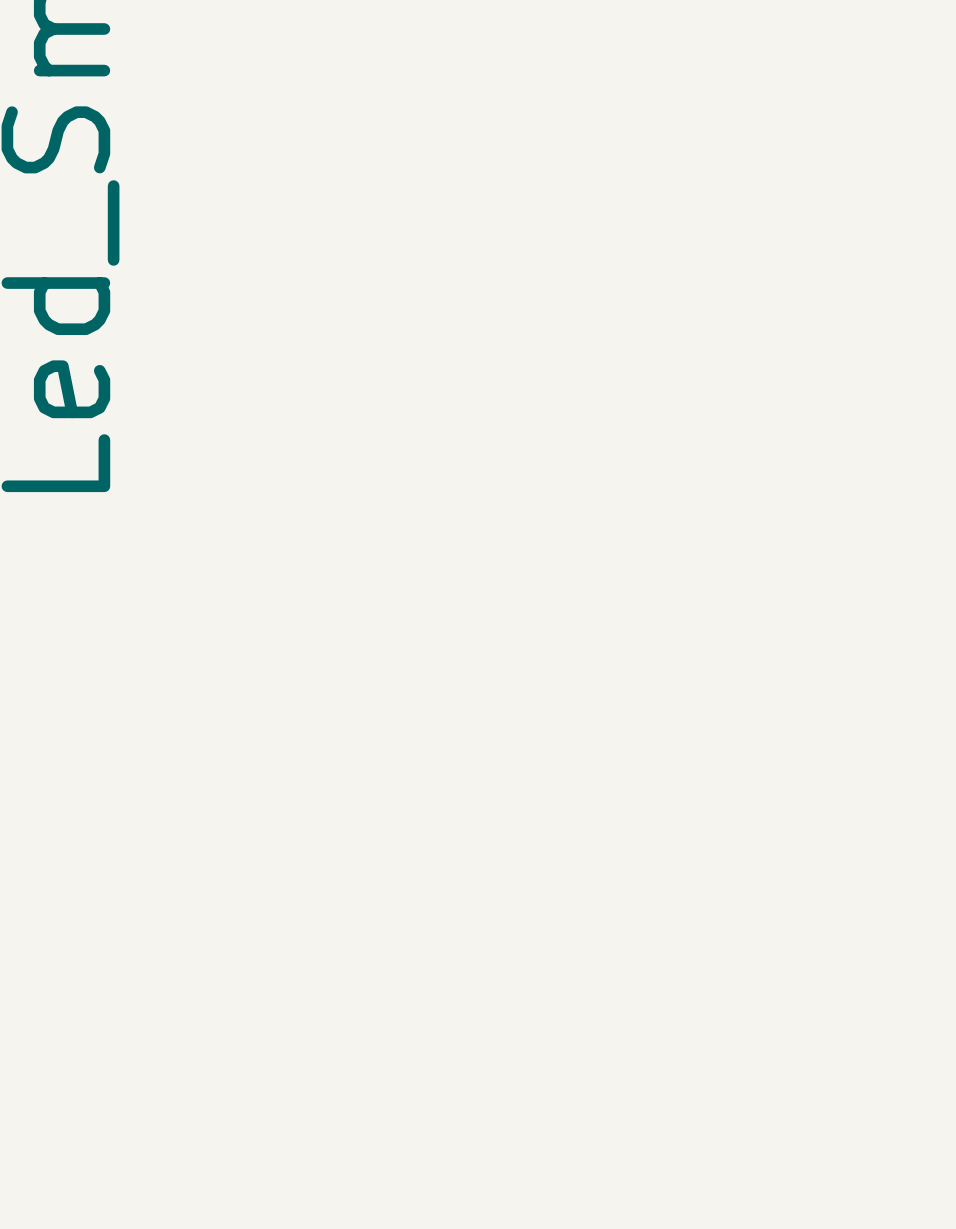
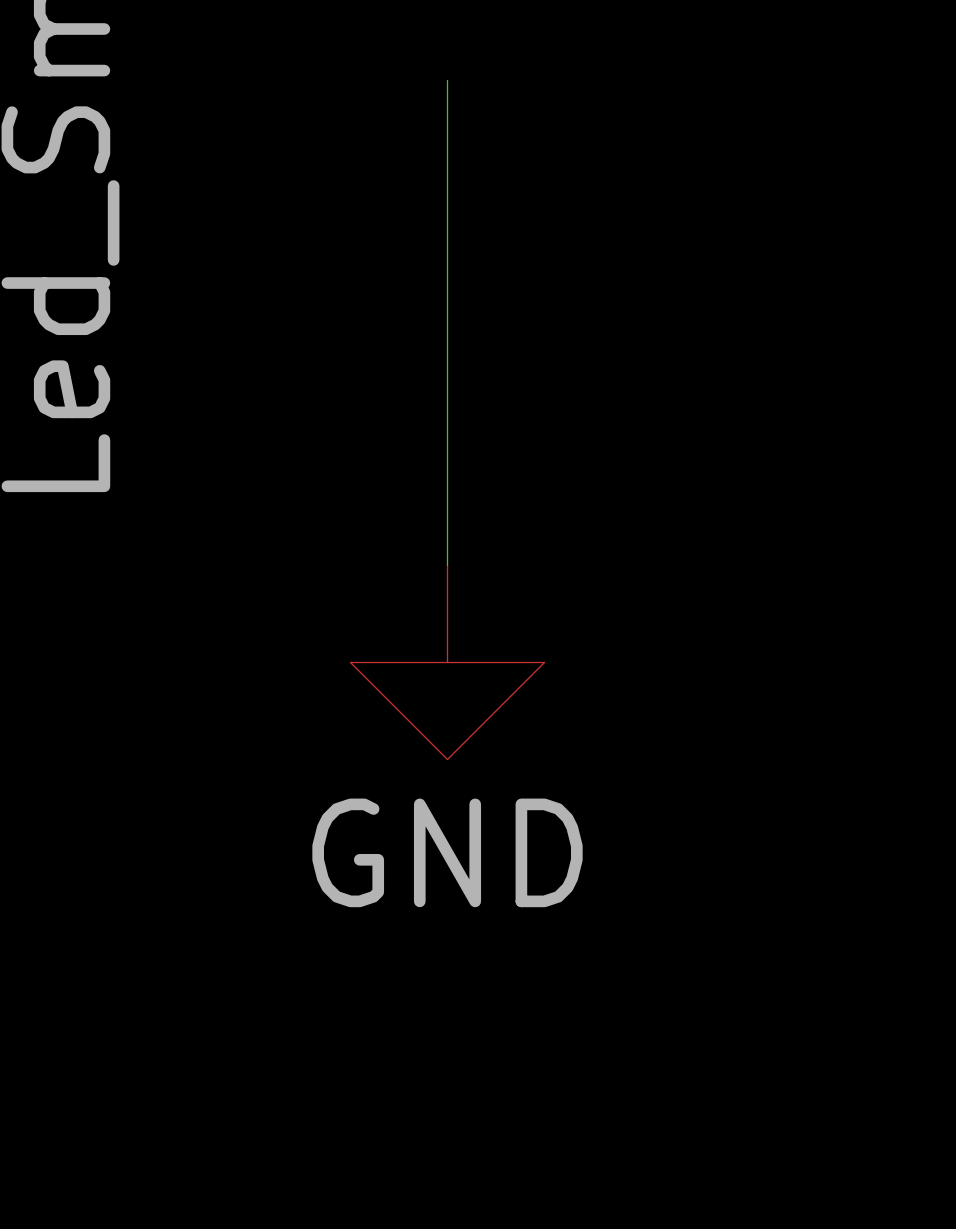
wire: none -> (447, 80) (447, 565)
power symbol: none -> GND (447, 662)

